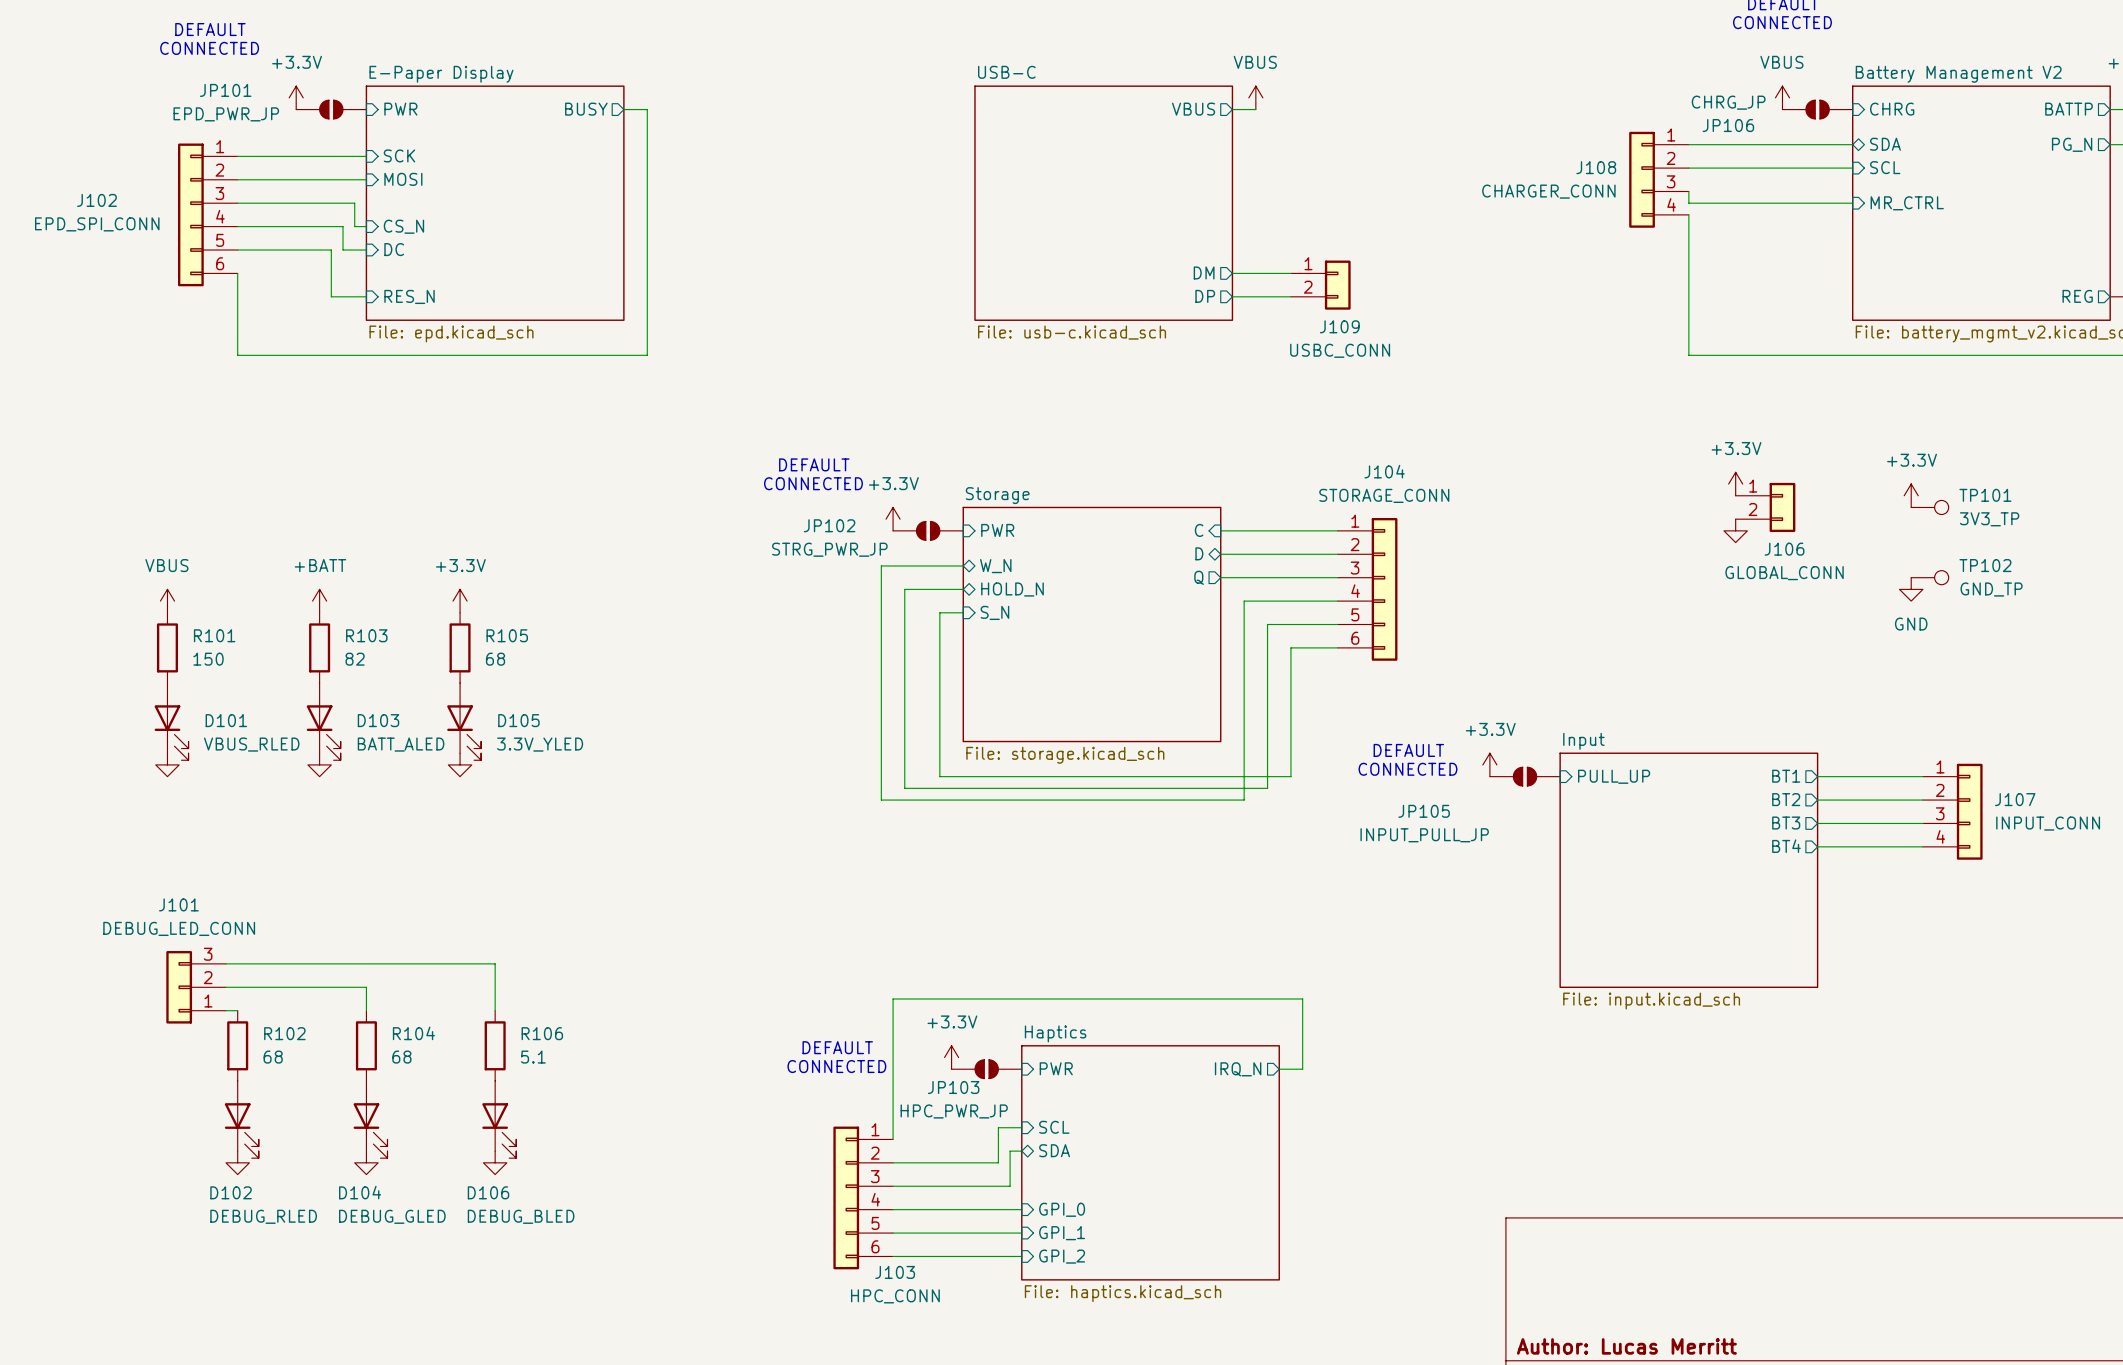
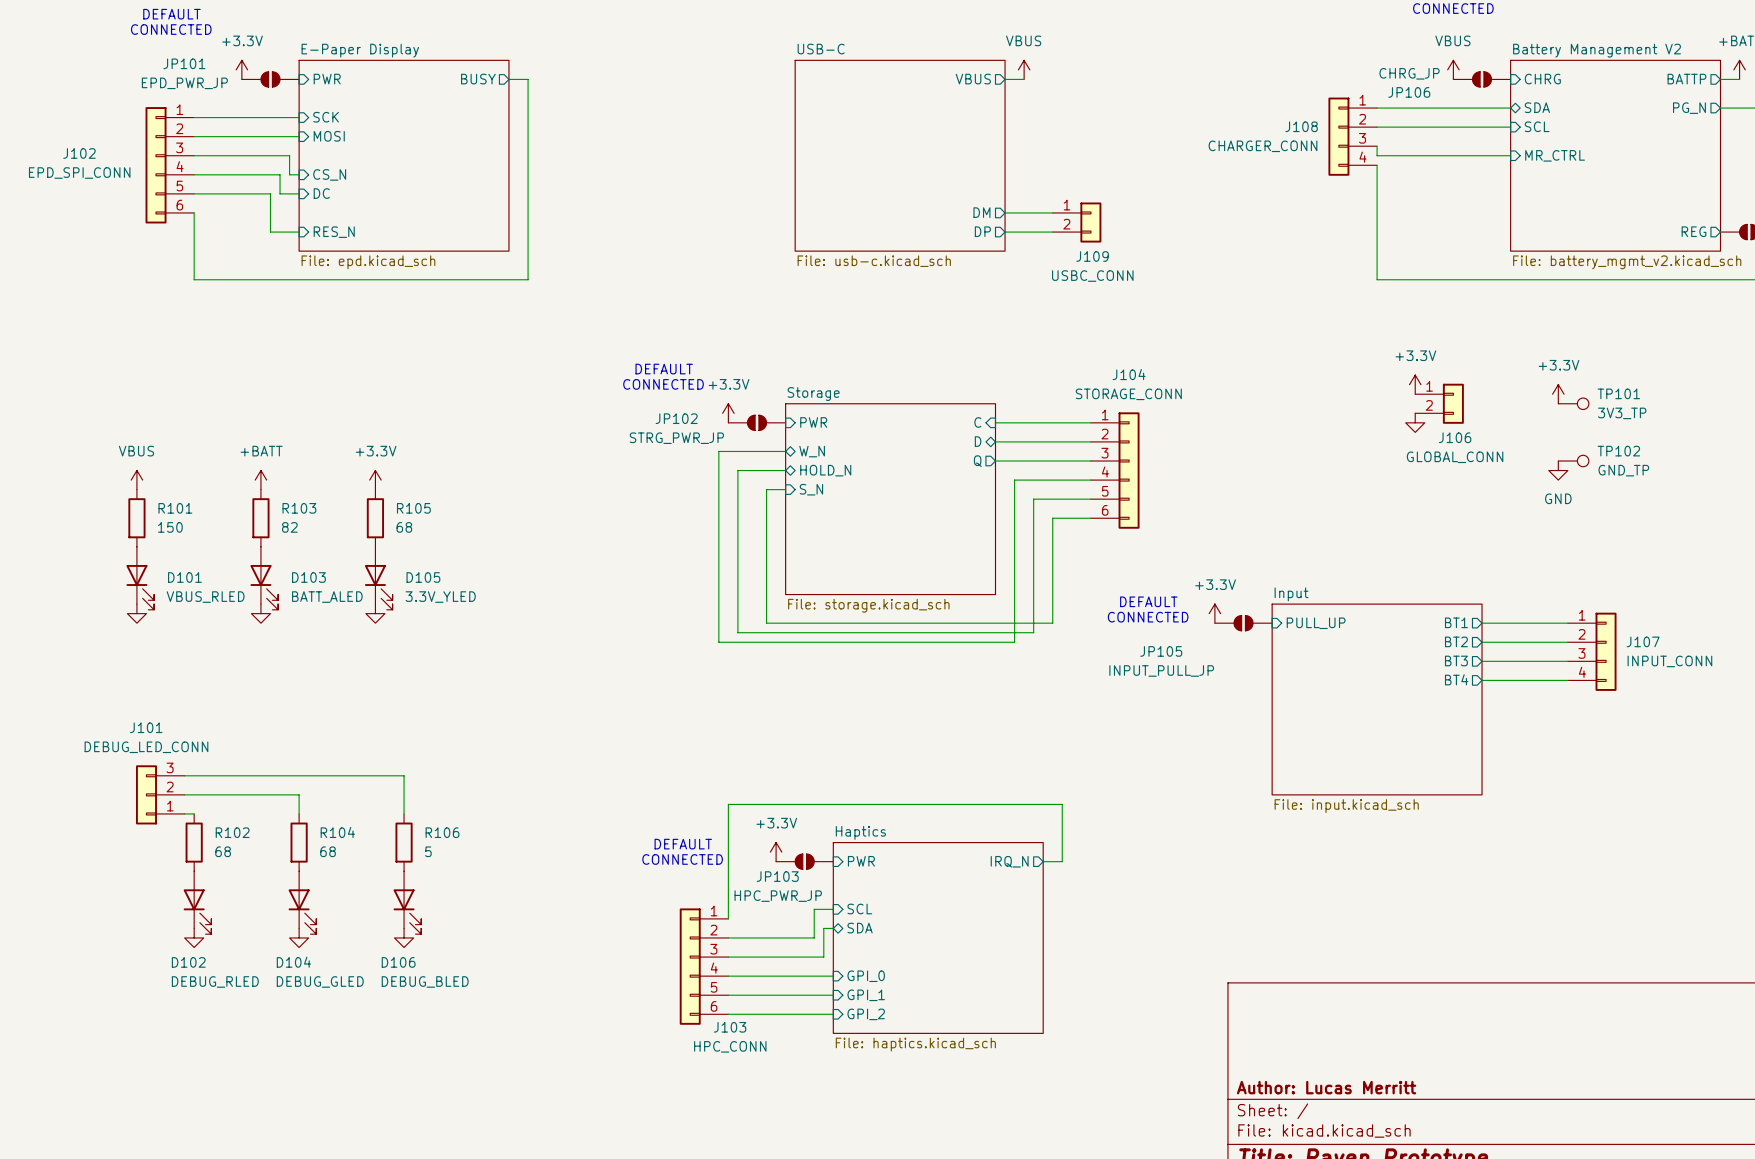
R106 value: 5.1 (533, 1057) -> 5 (428, 851)

